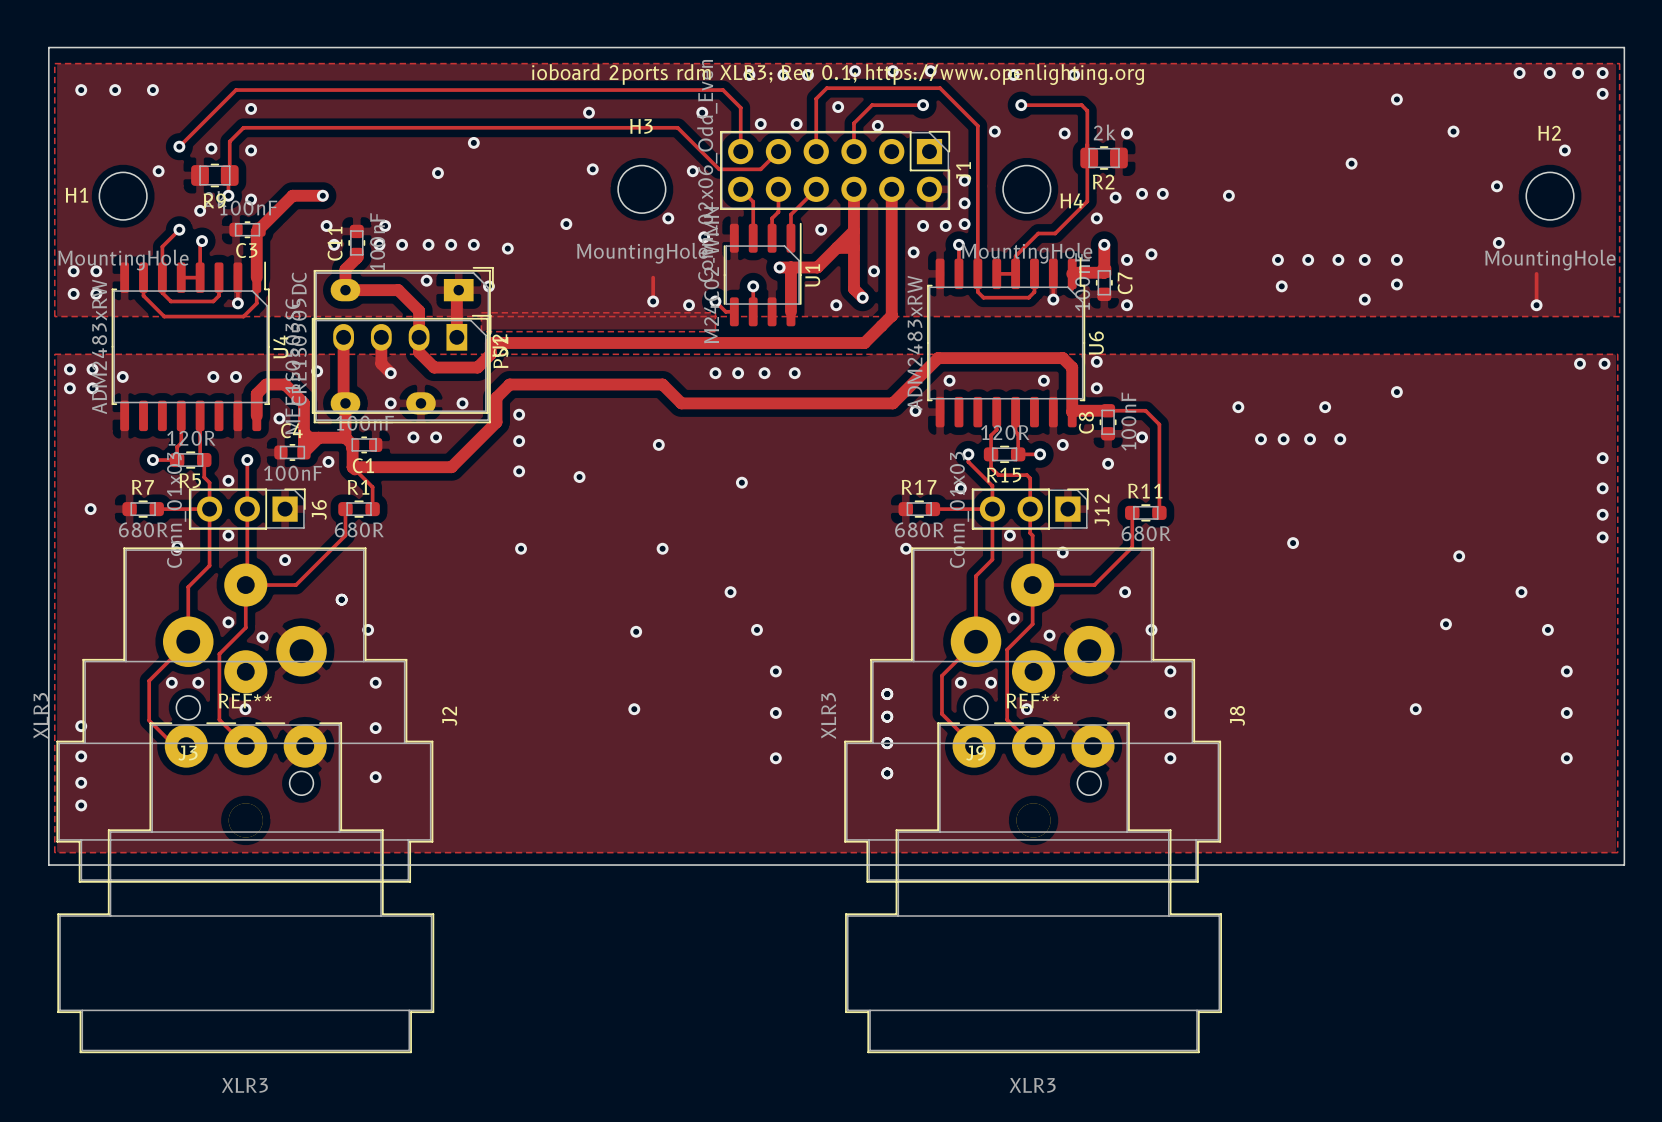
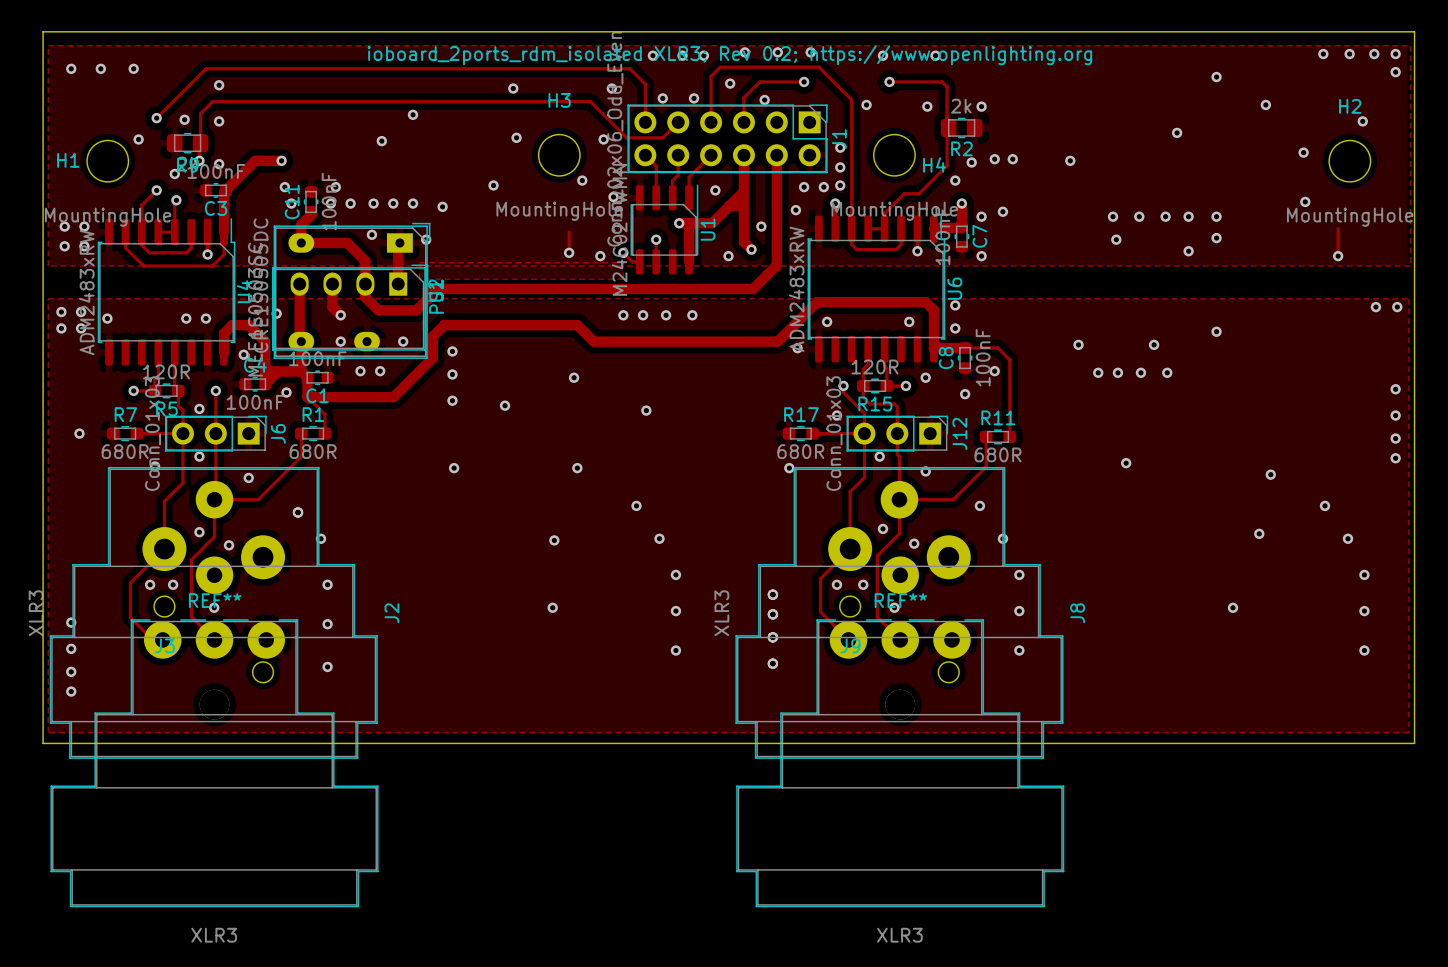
text: ioboard 2ports rdm XLR3; Rev 0.1; https://www.openlighting.org (838, 74) -> ioboard_2ports_rdm_isolated XLR3; Rev 0.2; https://www.openlighting.org (729, 55)

